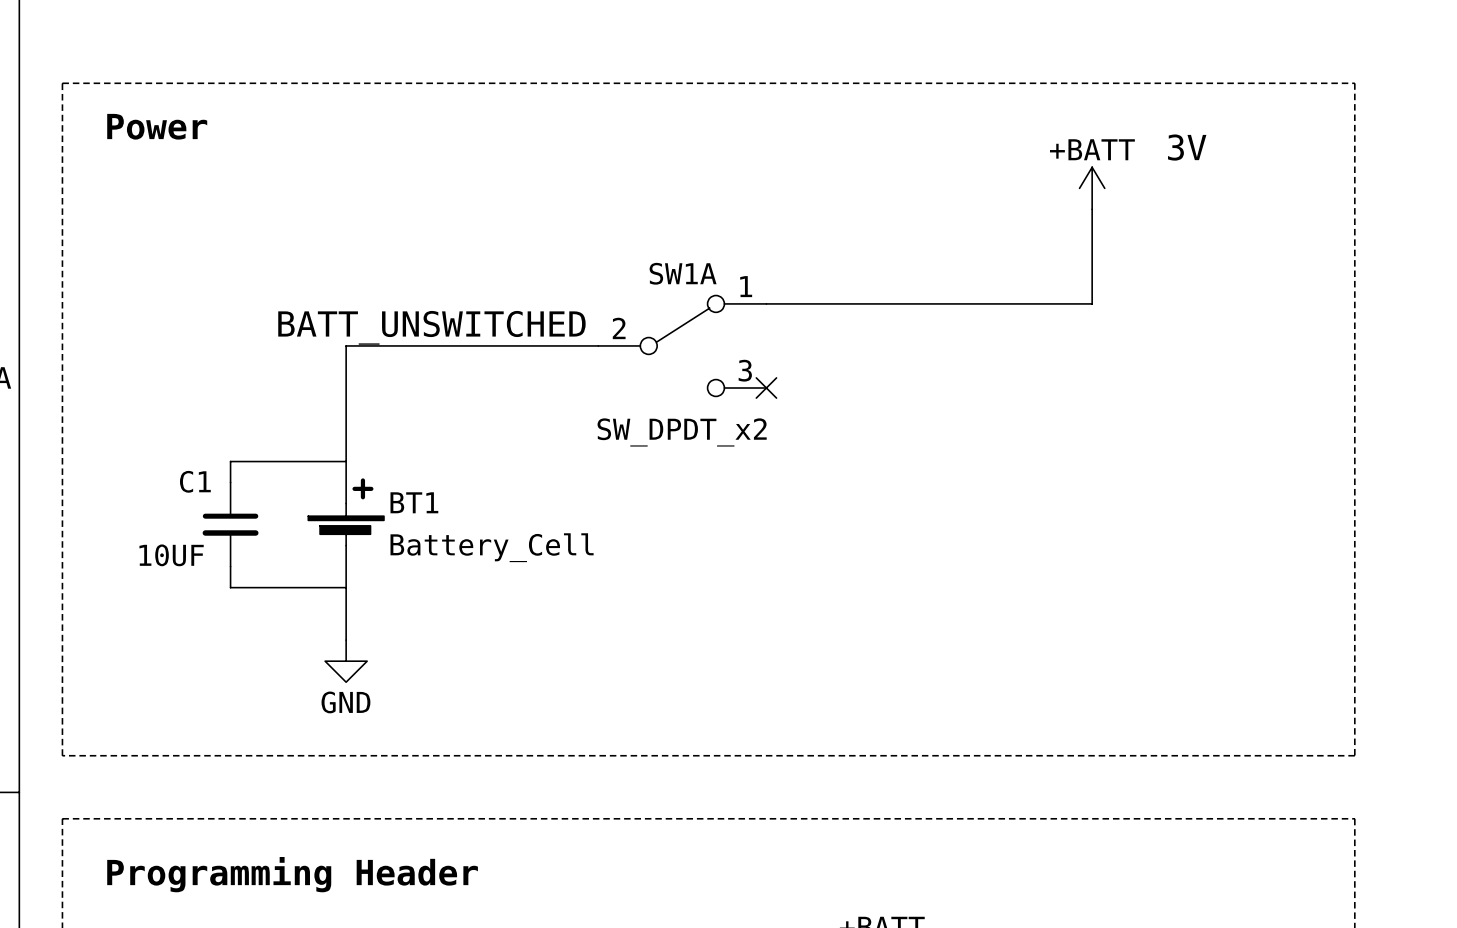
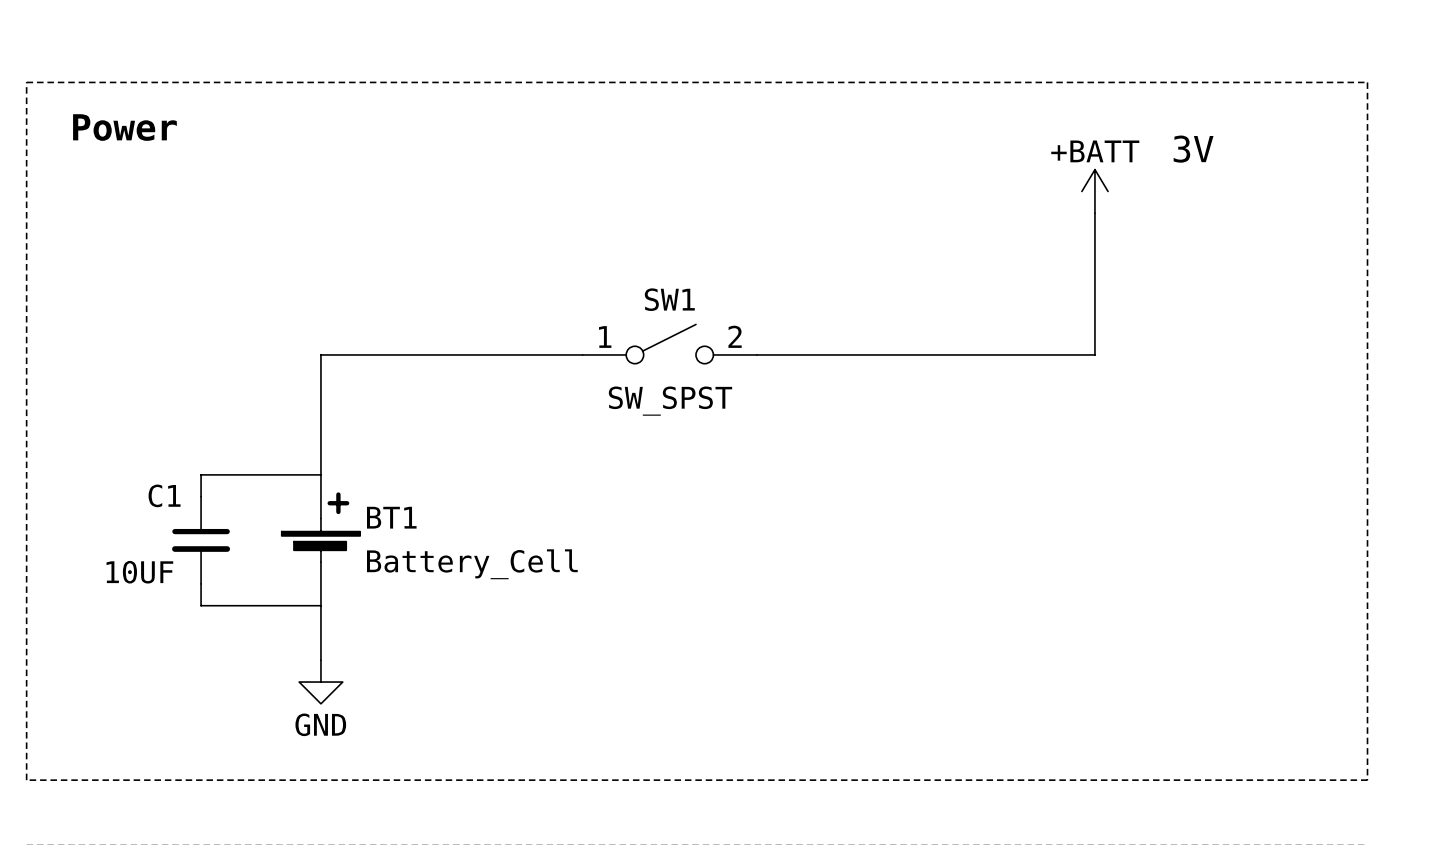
wire: (766, 303) (1092, 303) -> (757, 354) (1094, 354) (1094, 311)
label: BATT_UNSWITCHED (431, 327) -> none
SW1: none -> SW_SPST (669, 344)
SW1A: SW_DPDT_x2 (682, 345) -> none
no-connect mark: (766, 388) -> none

